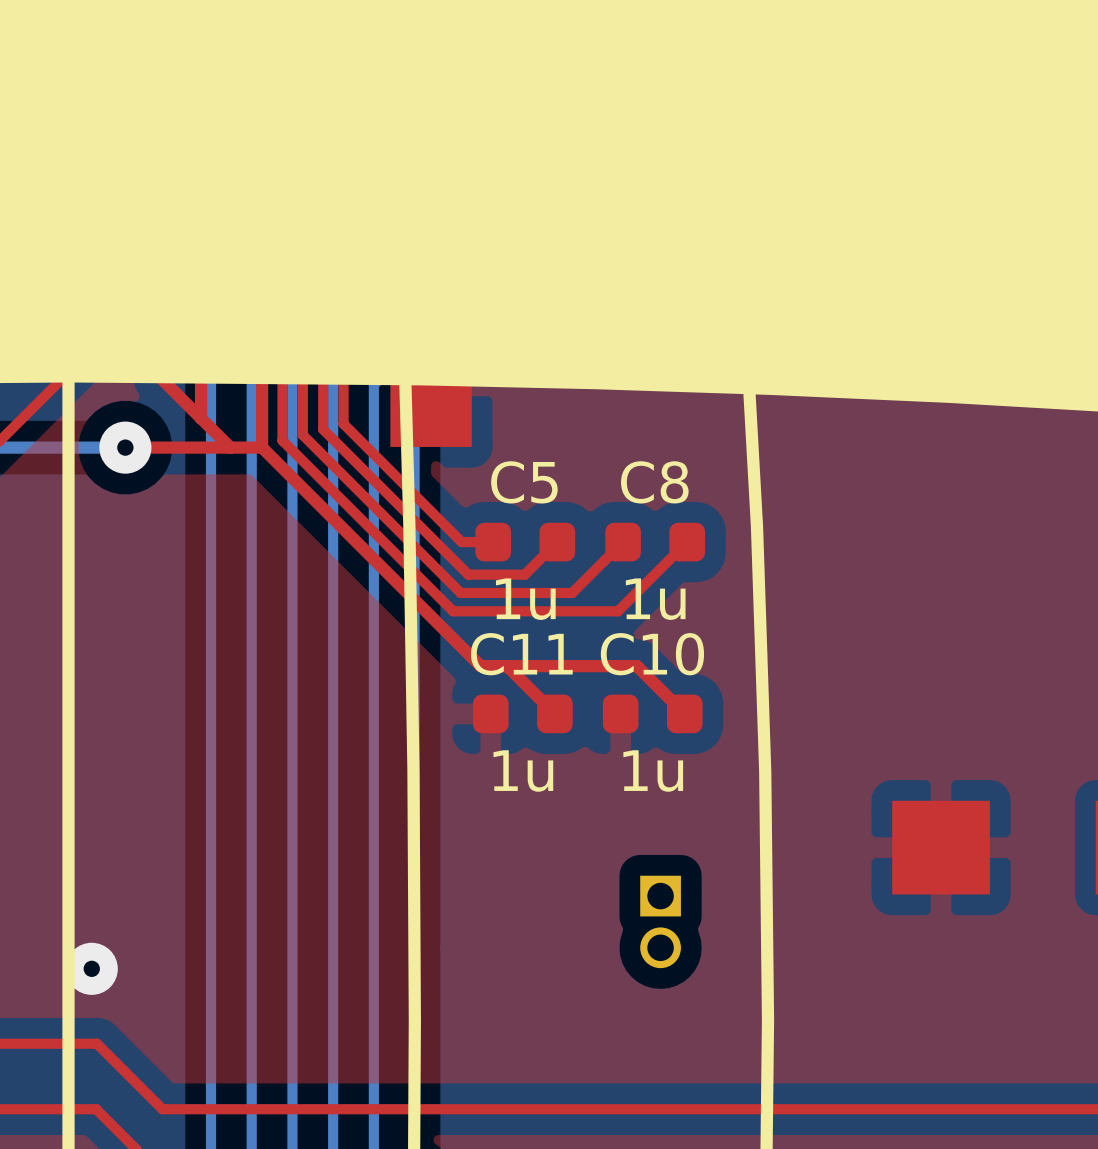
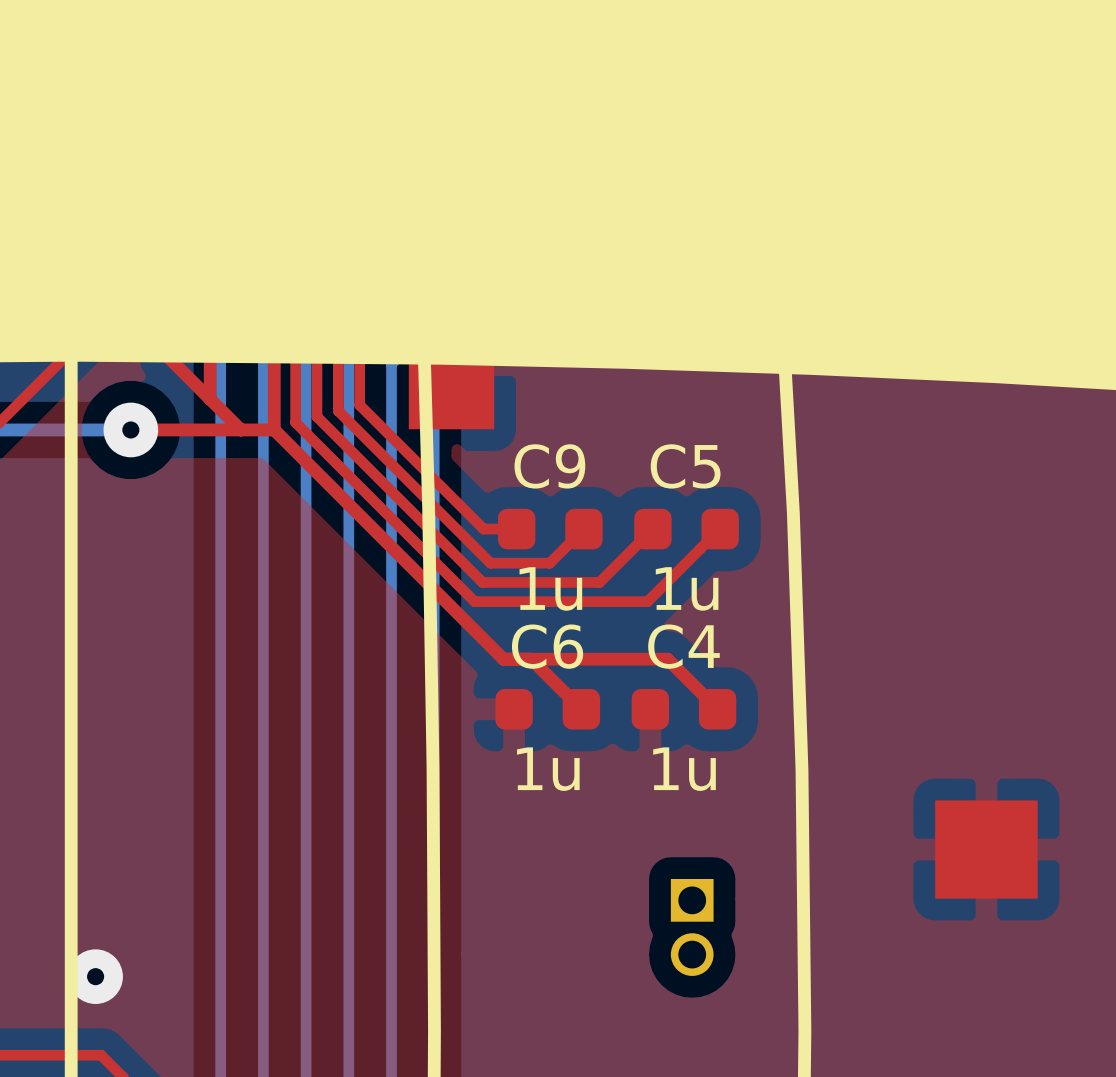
C5 name: C5 (524, 482) -> C9 (549, 466)
C8 name: C8 (654, 482) -> C5 (685, 466)
C11 name: C11 (521, 654) -> C6 (547, 646)
C10 name: C10 (652, 654) -> C4 (683, 646)

